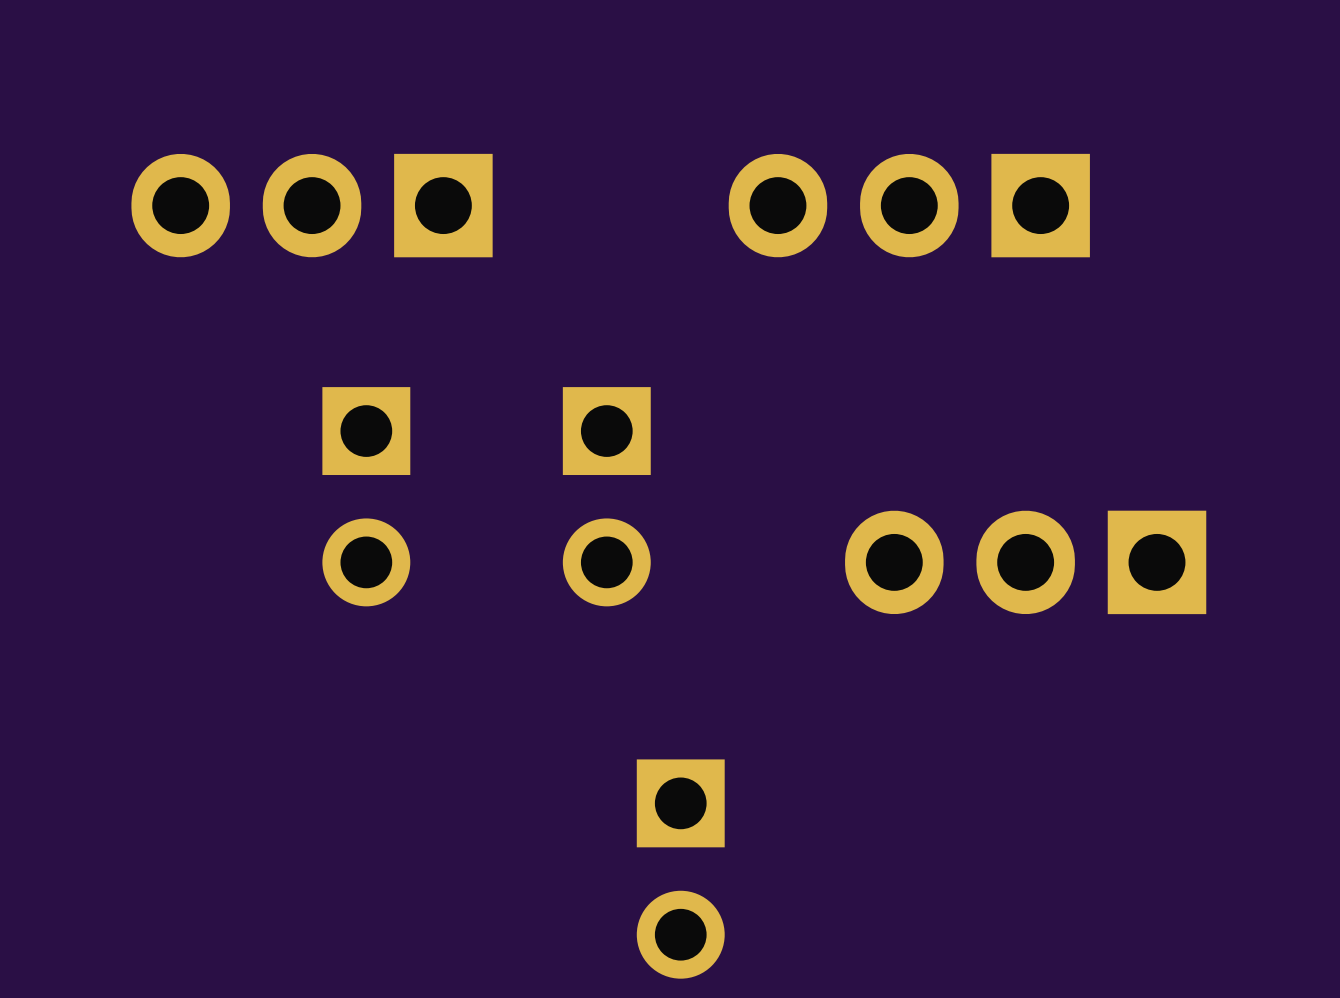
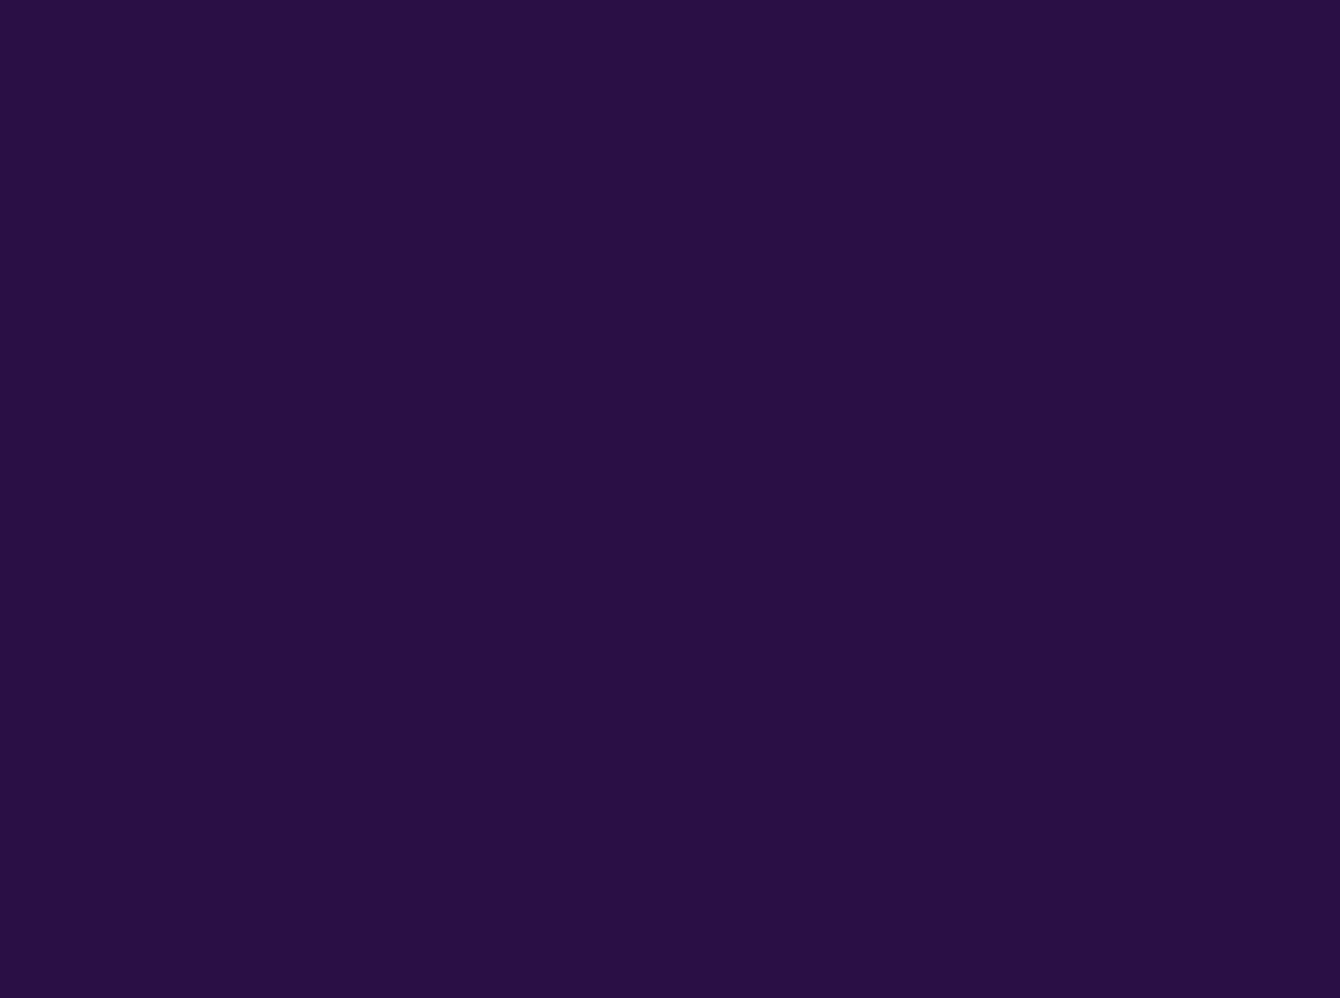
part: (312, 205) -> none
part: (909, 205) -> none
part: (366, 496) -> none
part: (606, 496) -> none
part: (1025, 562) -> none
part: (680, 869) -> none

